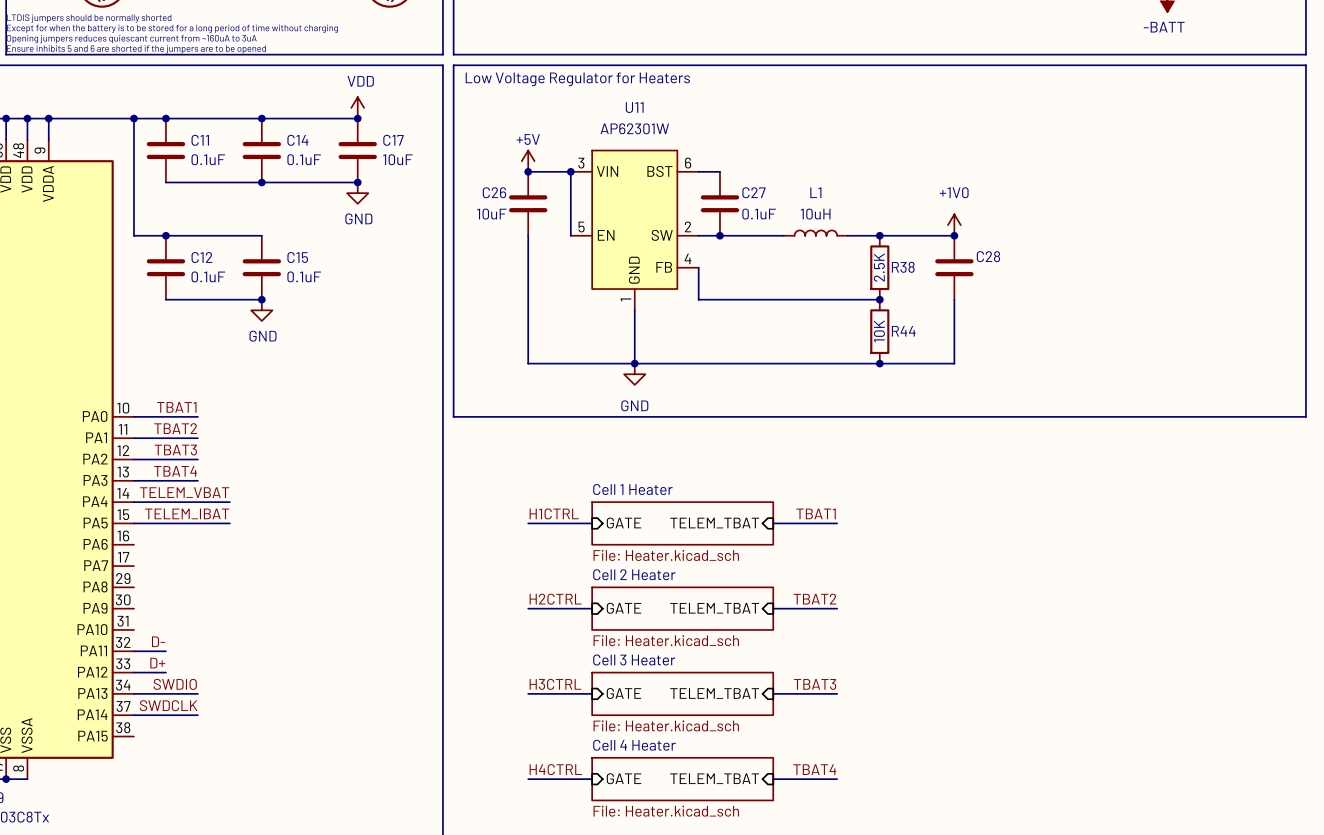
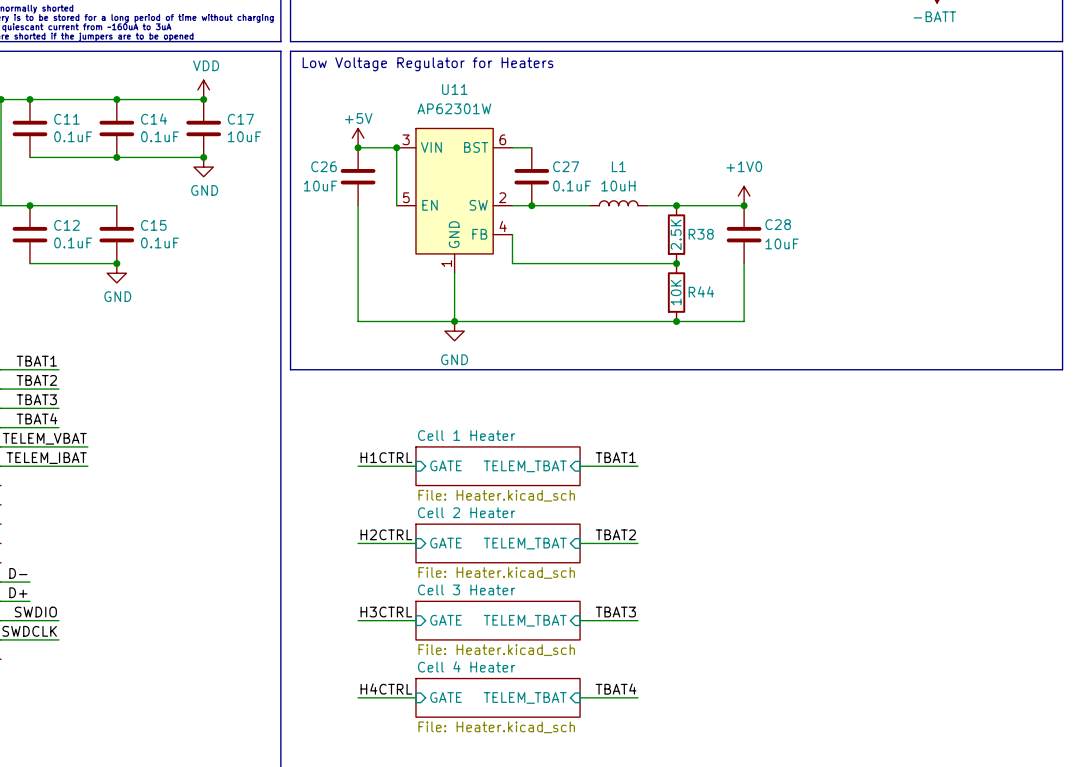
C28 value: none -> 10uF (782, 243)

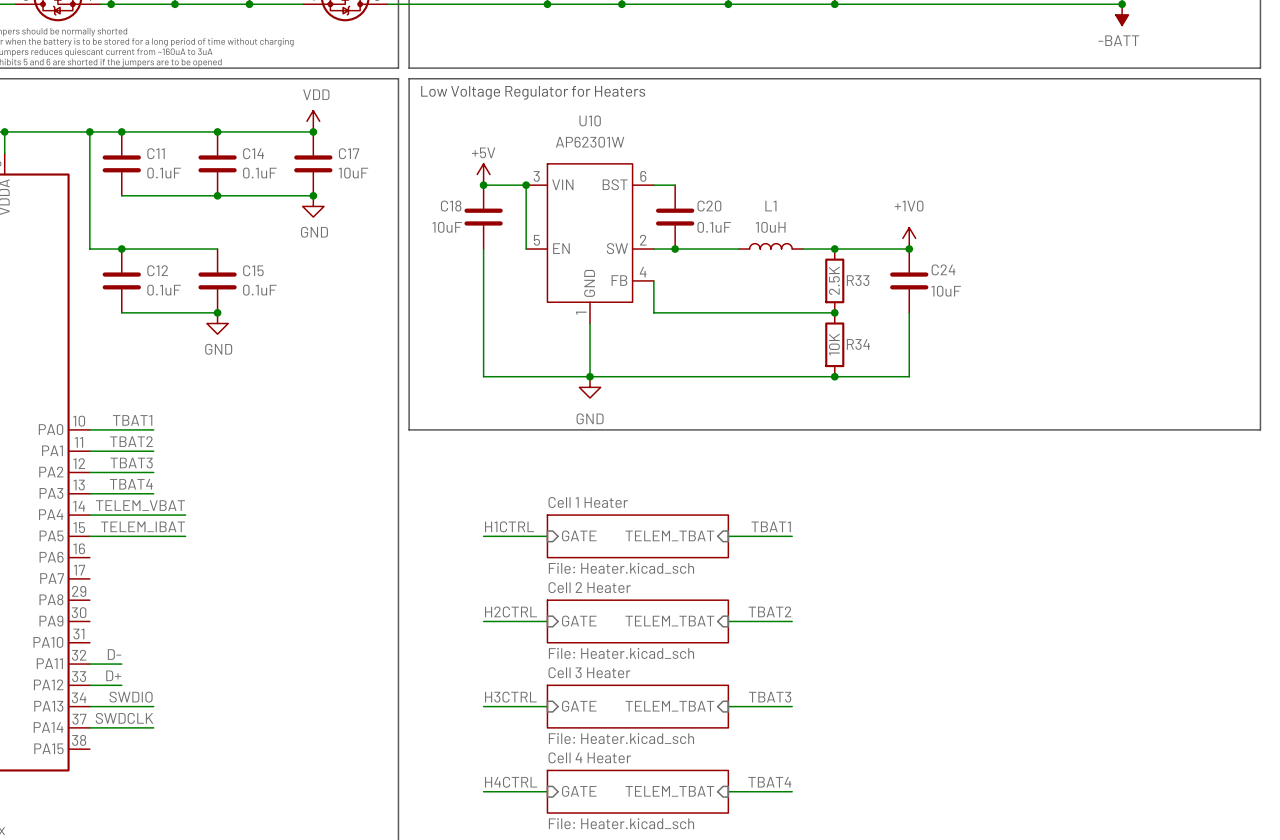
U11 name: U11 (454, 89) -> U10 (590, 120)
C26 name: C26 (324, 166) -> C18 (451, 206)
C27 name: C27 (566, 166) -> C20 (709, 206)
C28 name: C28 (778, 224) -> C24 (943, 269)
R38 name: R38 (701, 234) -> R33 (858, 280)
R44 name: R44 (701, 291) -> R34 (858, 344)

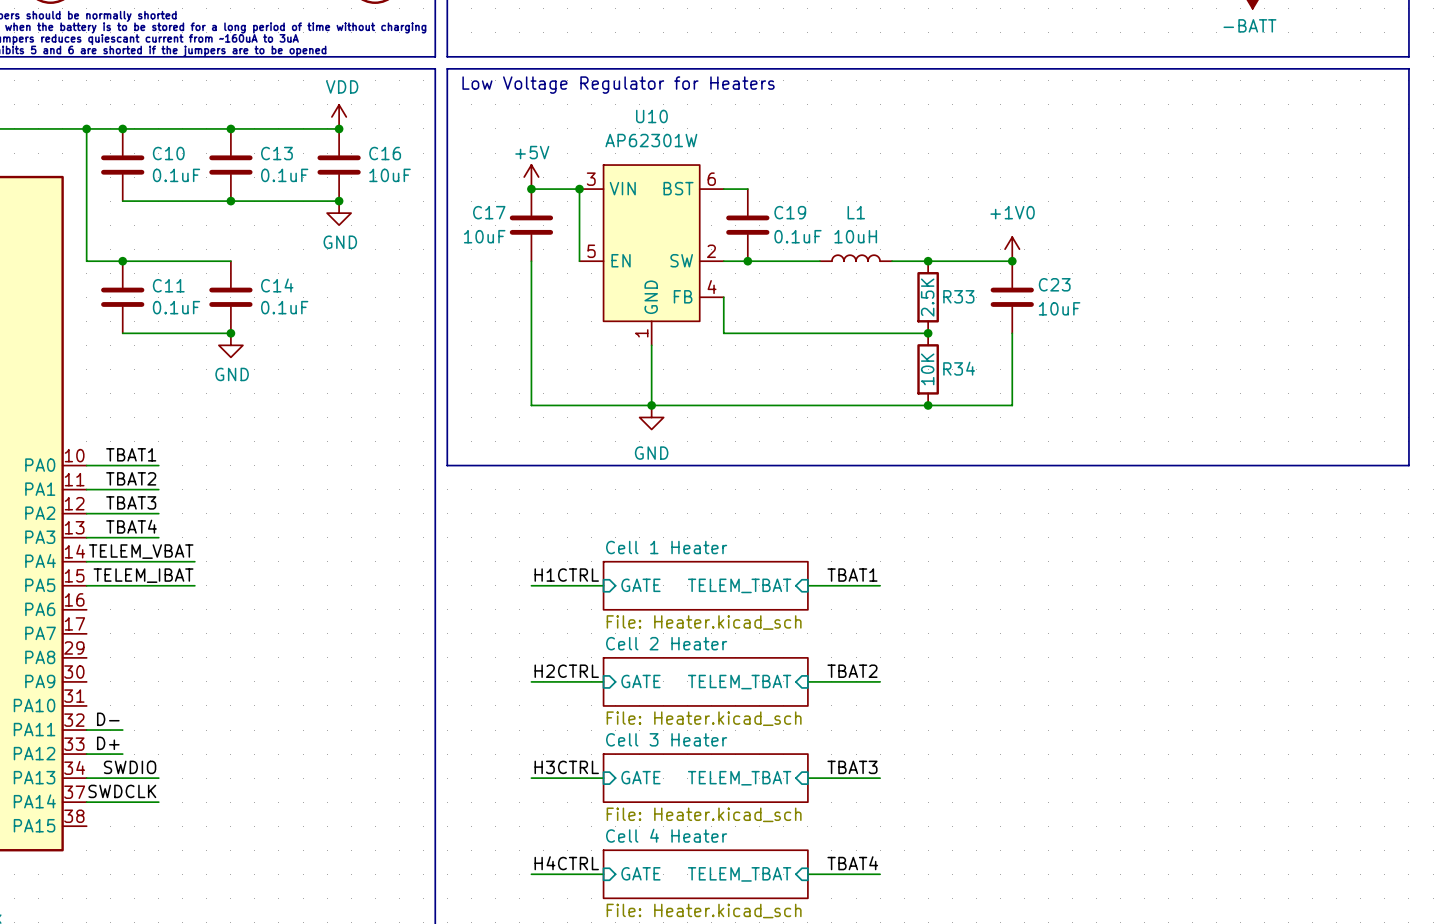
C11 name: C11 (156, 153) -> C10 (168, 153)
C14 name: C14 (253, 153) -> C13 (276, 153)
C17 name: C17 (349, 153) -> C16 (385, 153)
C18 name: C18 (451, 206) -> C17 (489, 212)
C20 name: C20 (709, 206) -> C19 (790, 212)
C24 name: C24 (943, 269) -> C23 (1054, 284)
C12 name: C12 (157, 270) -> C11 (168, 285)
C15 name: C15 (253, 270) -> C14 (277, 285)

